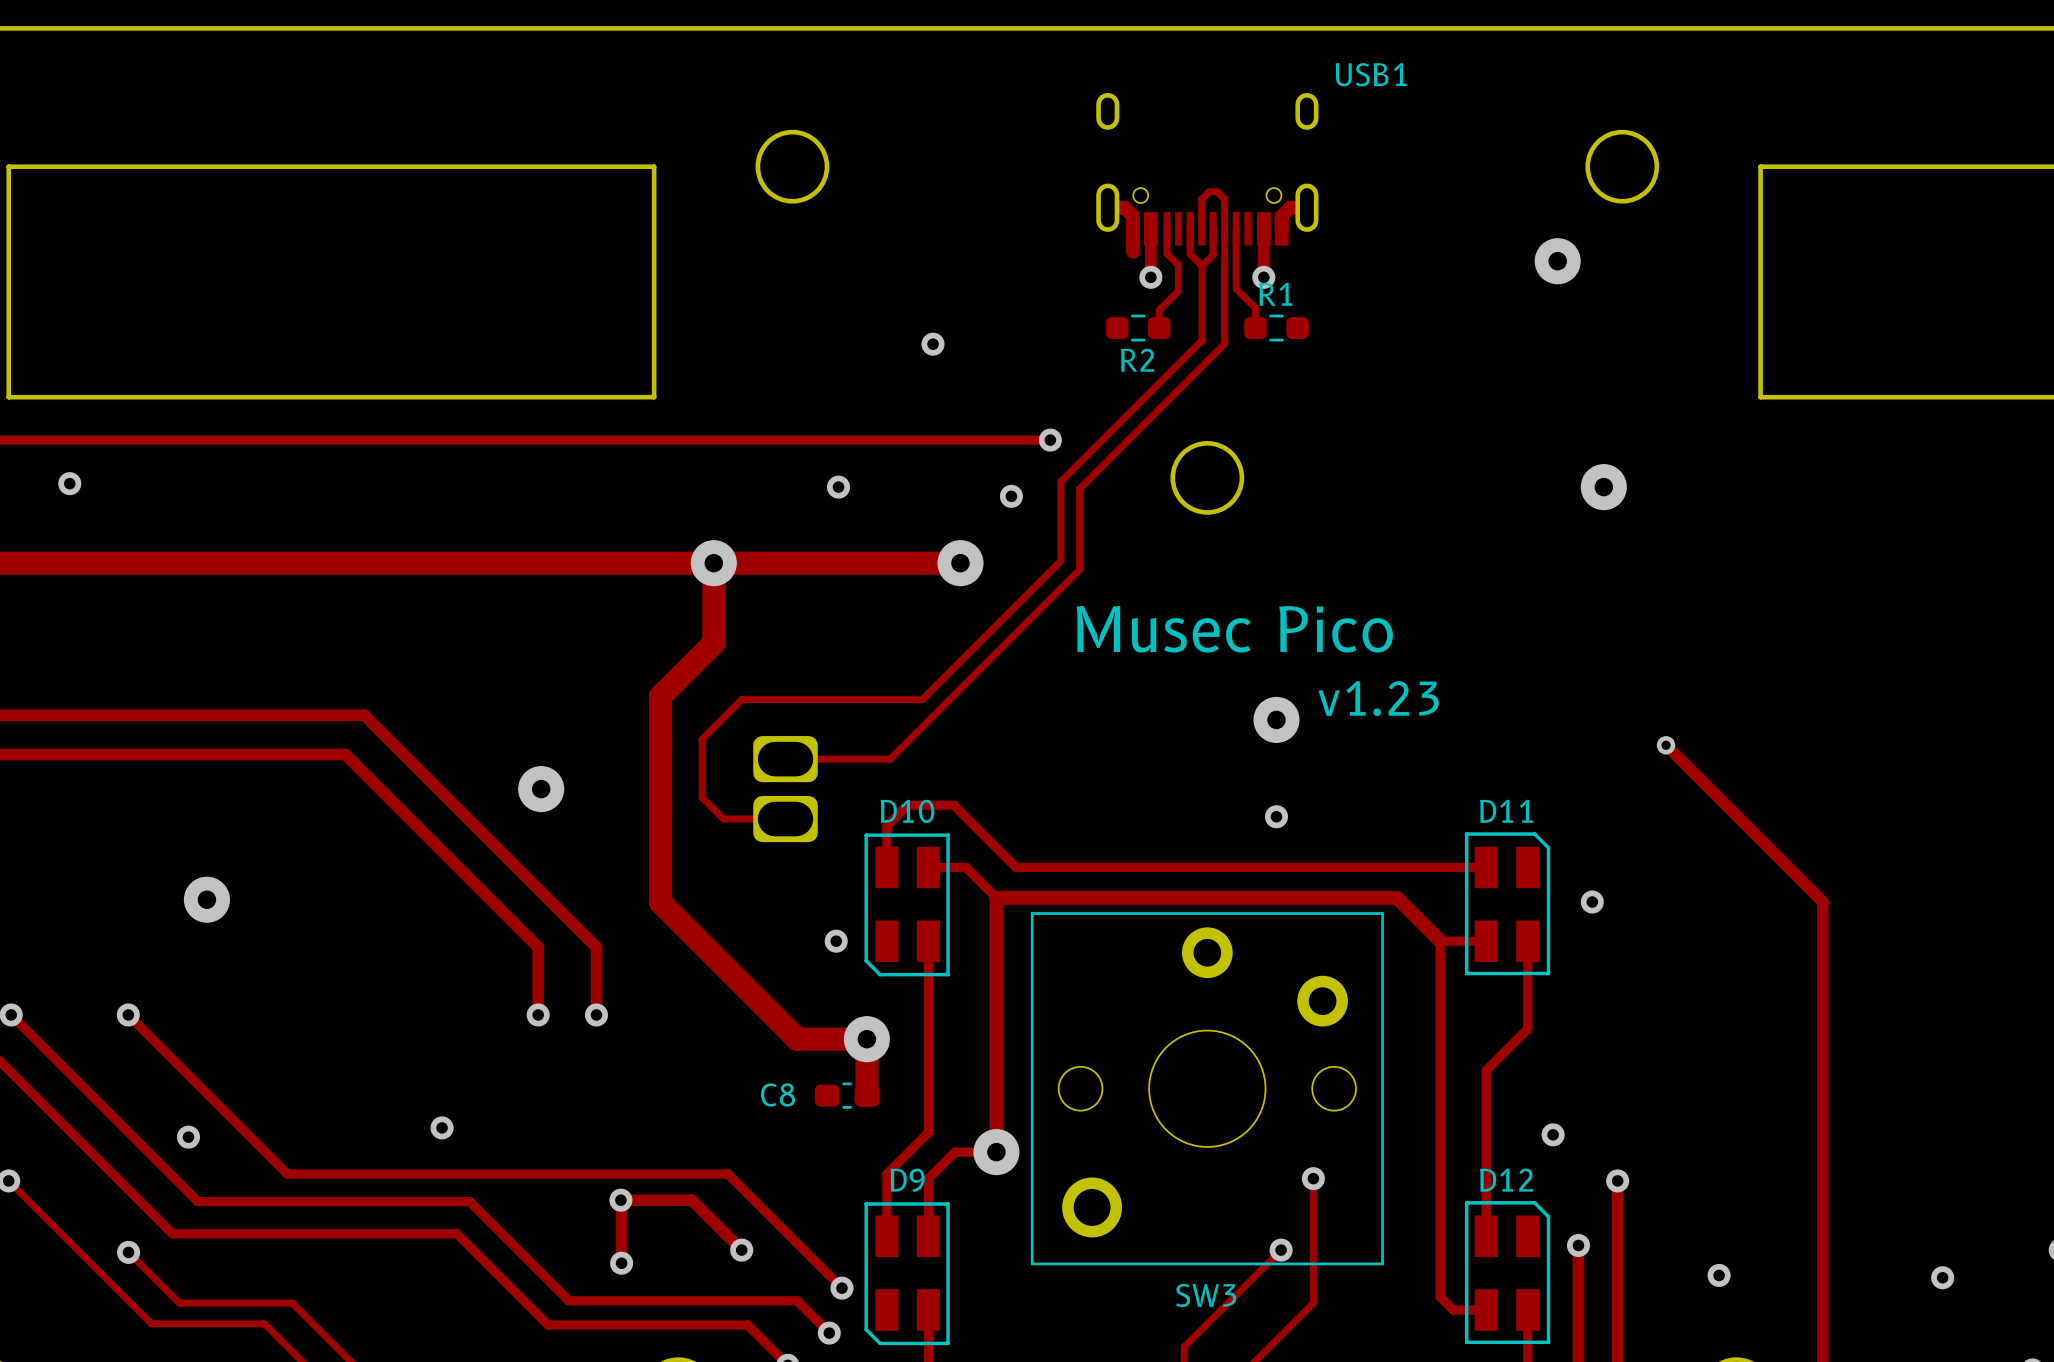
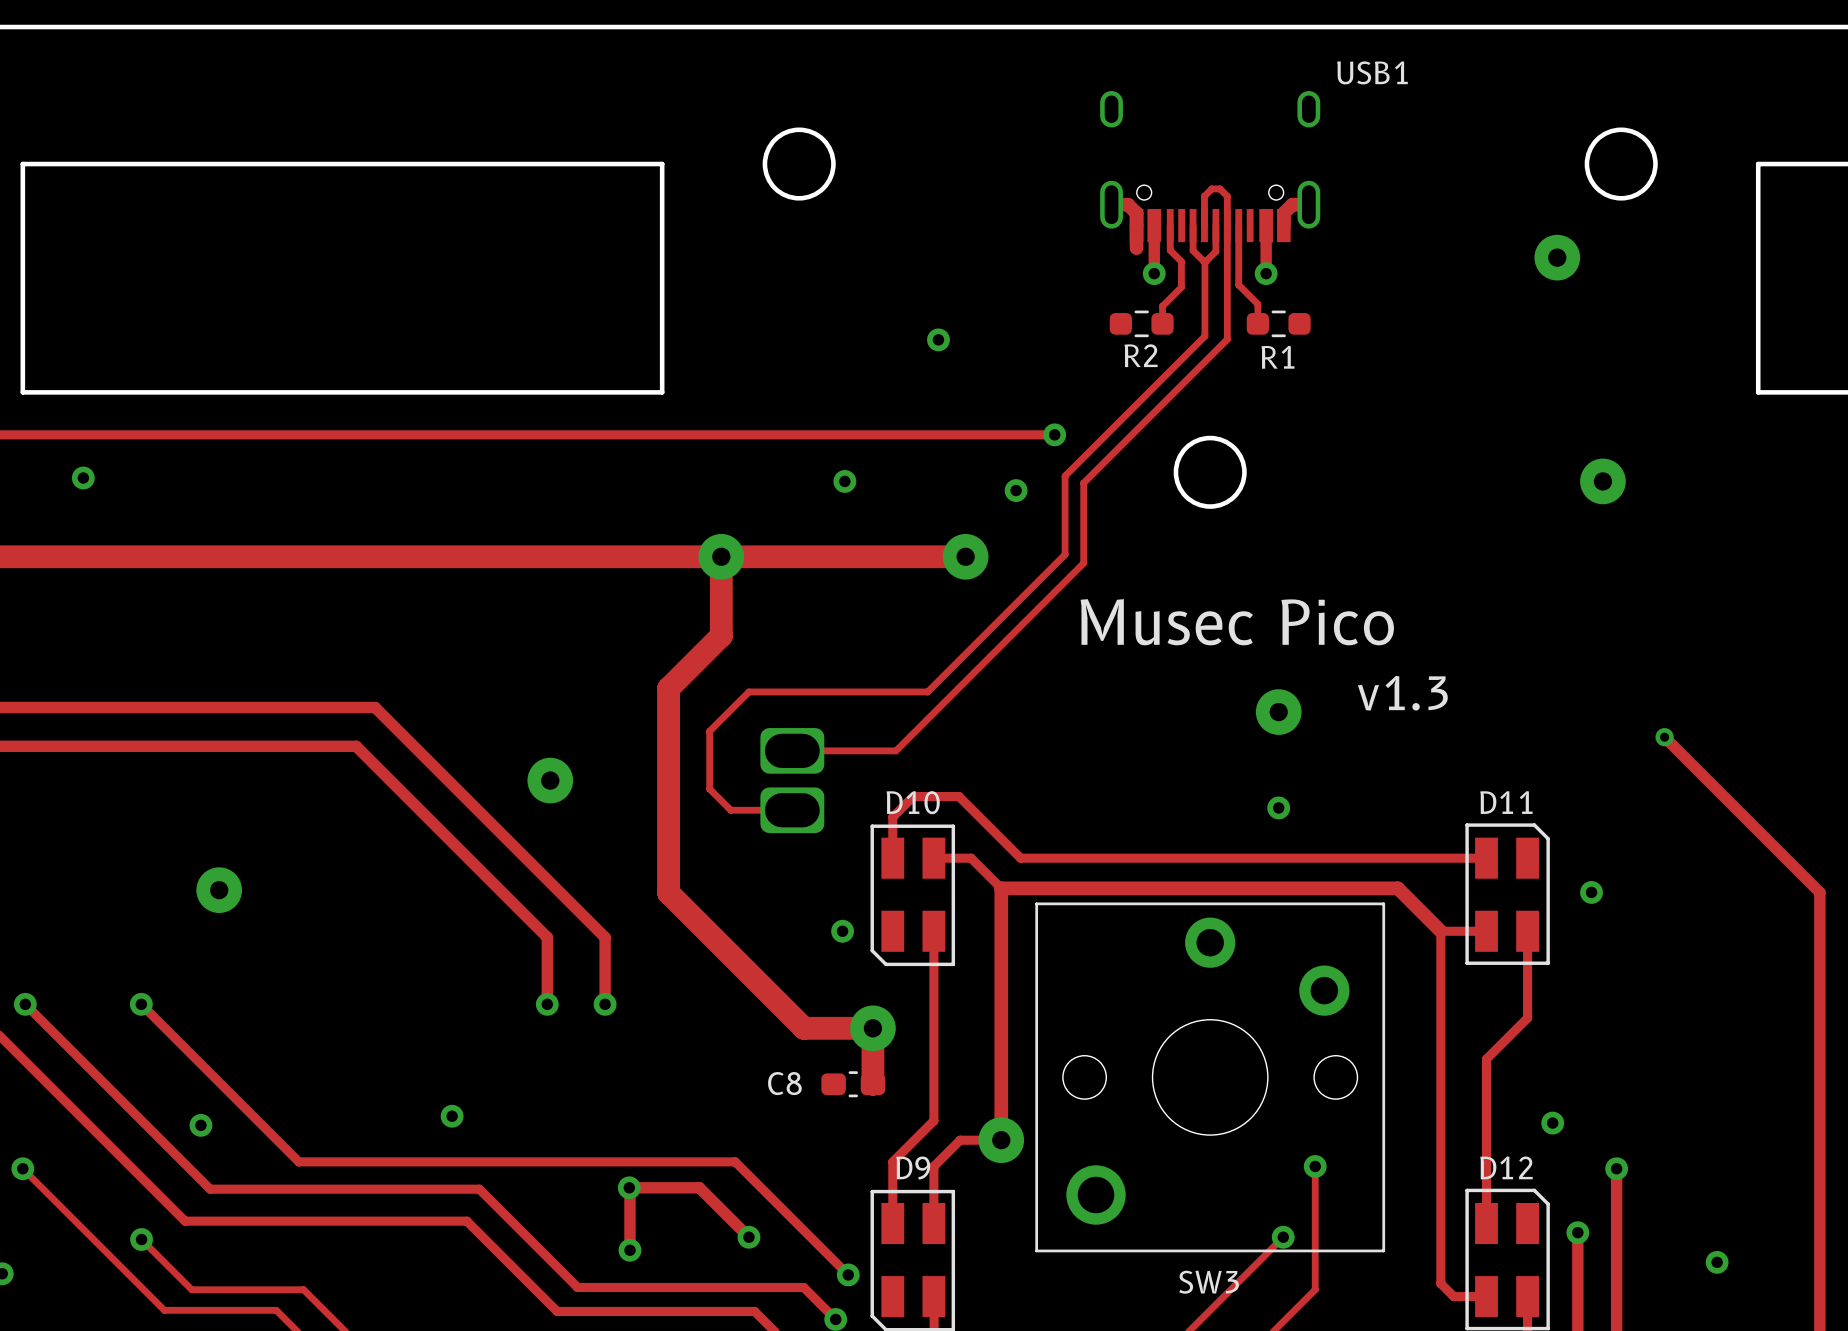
R1 name position: R1 (1275, 294) -> R1 (1277, 357)
text: v1.23 (1378, 698) -> v1.3 (1402, 693)

